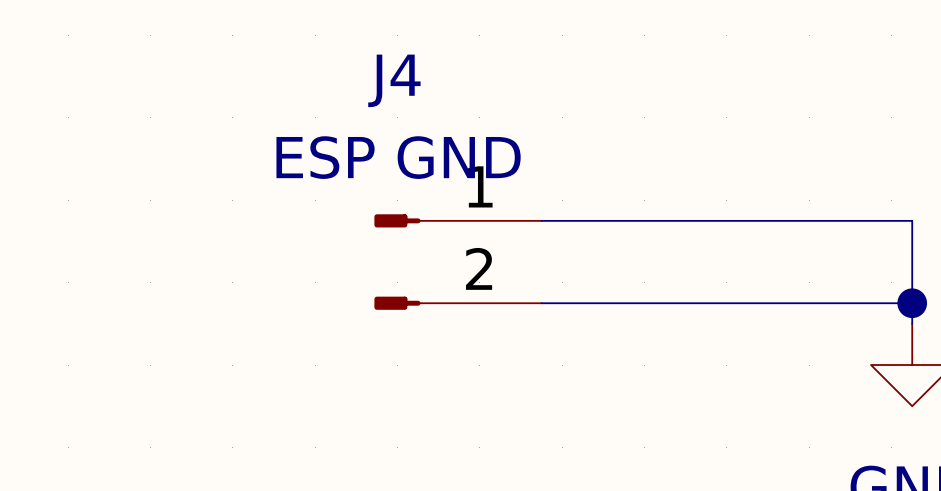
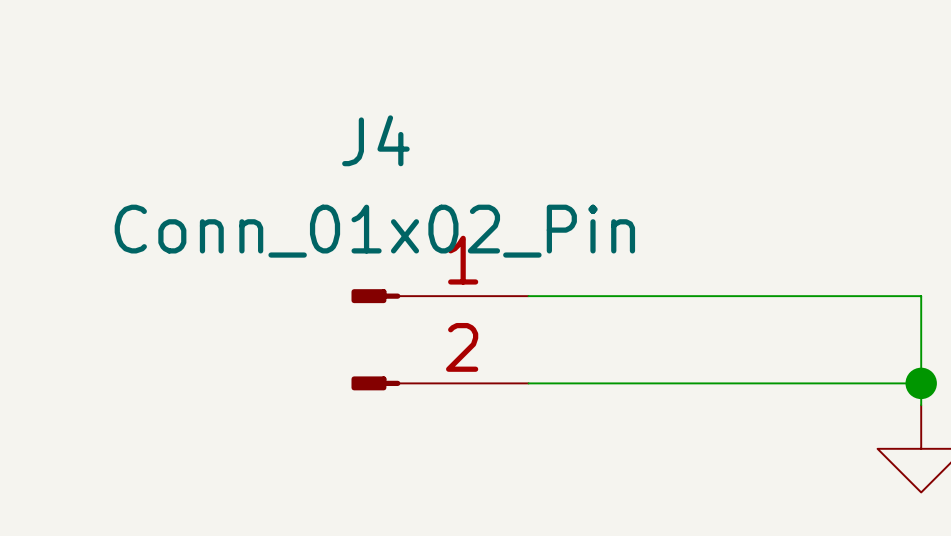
J4 value: ESP GND (398, 157) -> Conn_01x02_Pin (374, 231)

